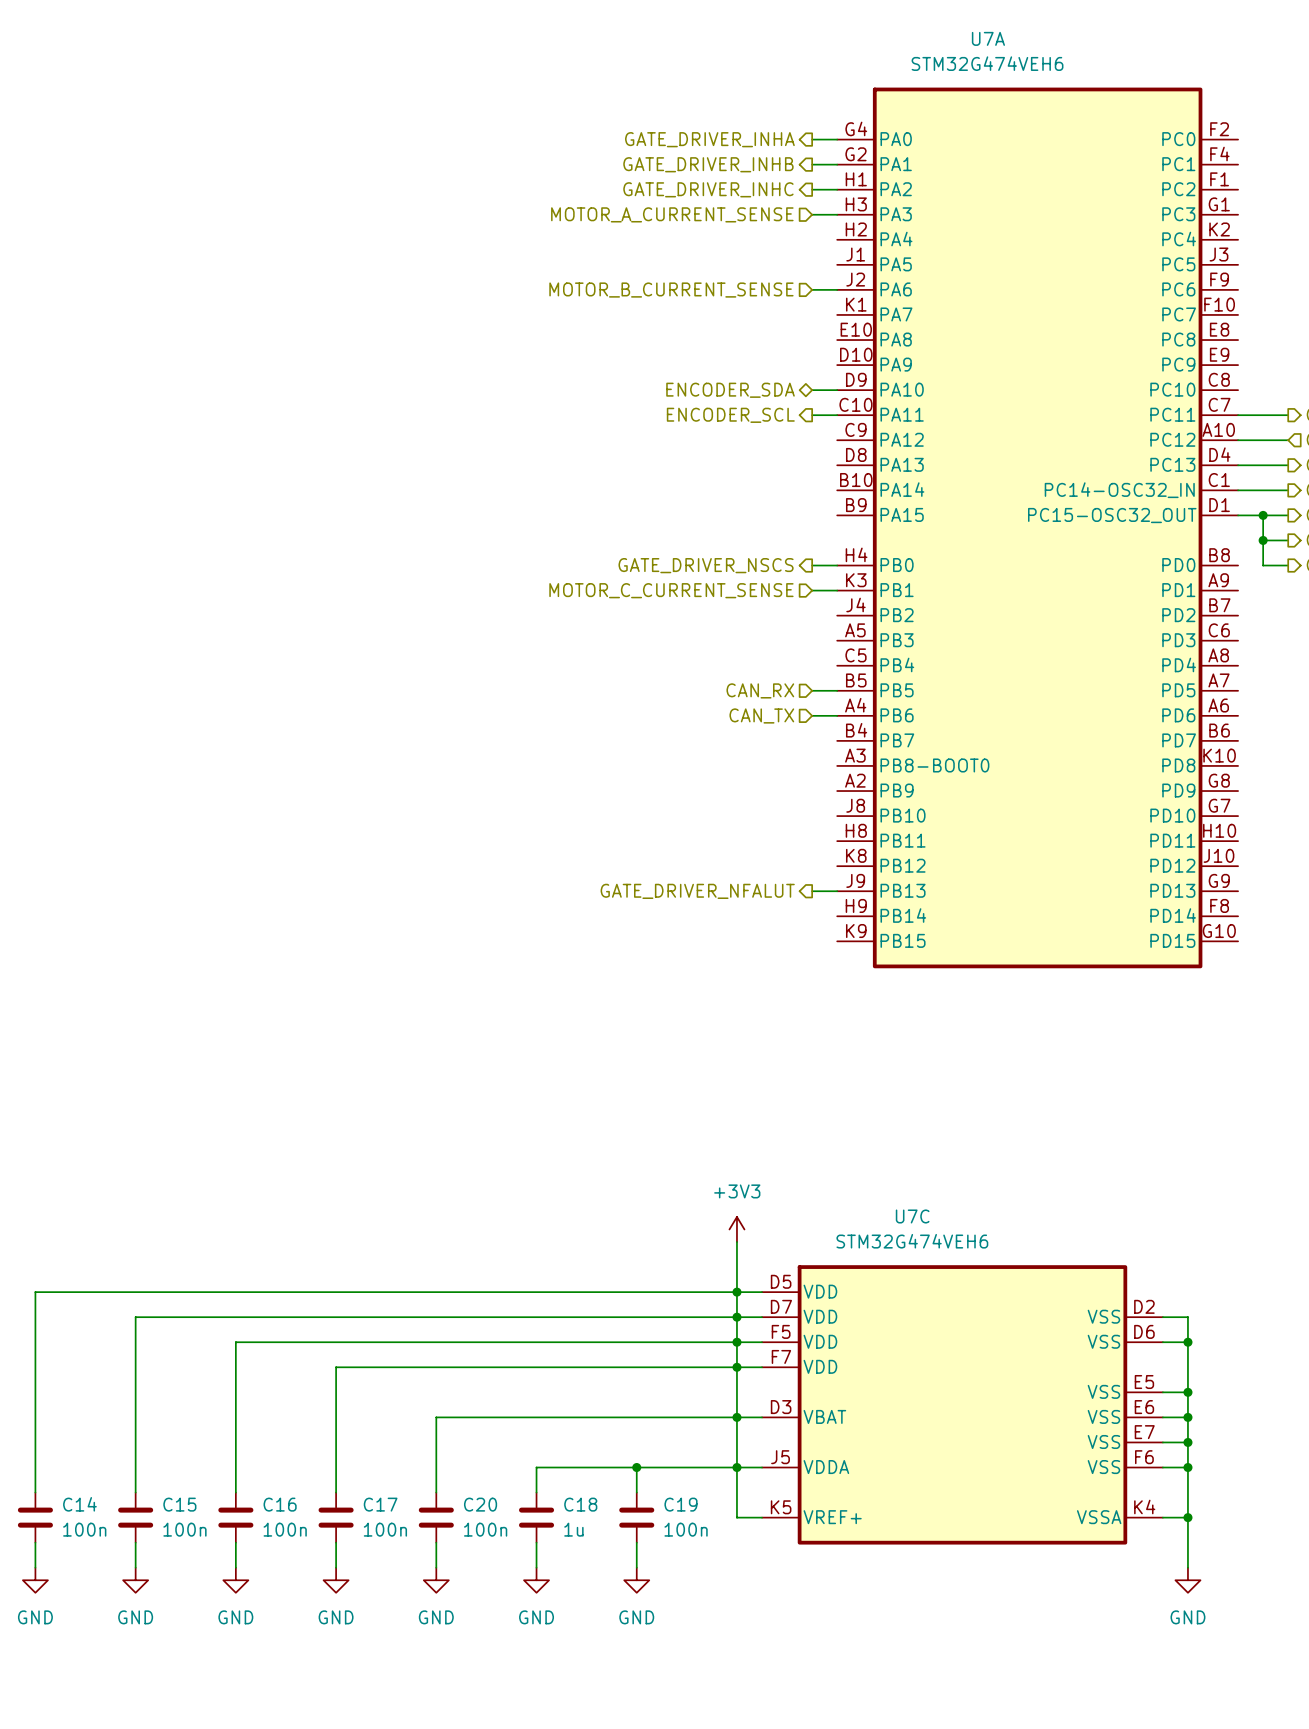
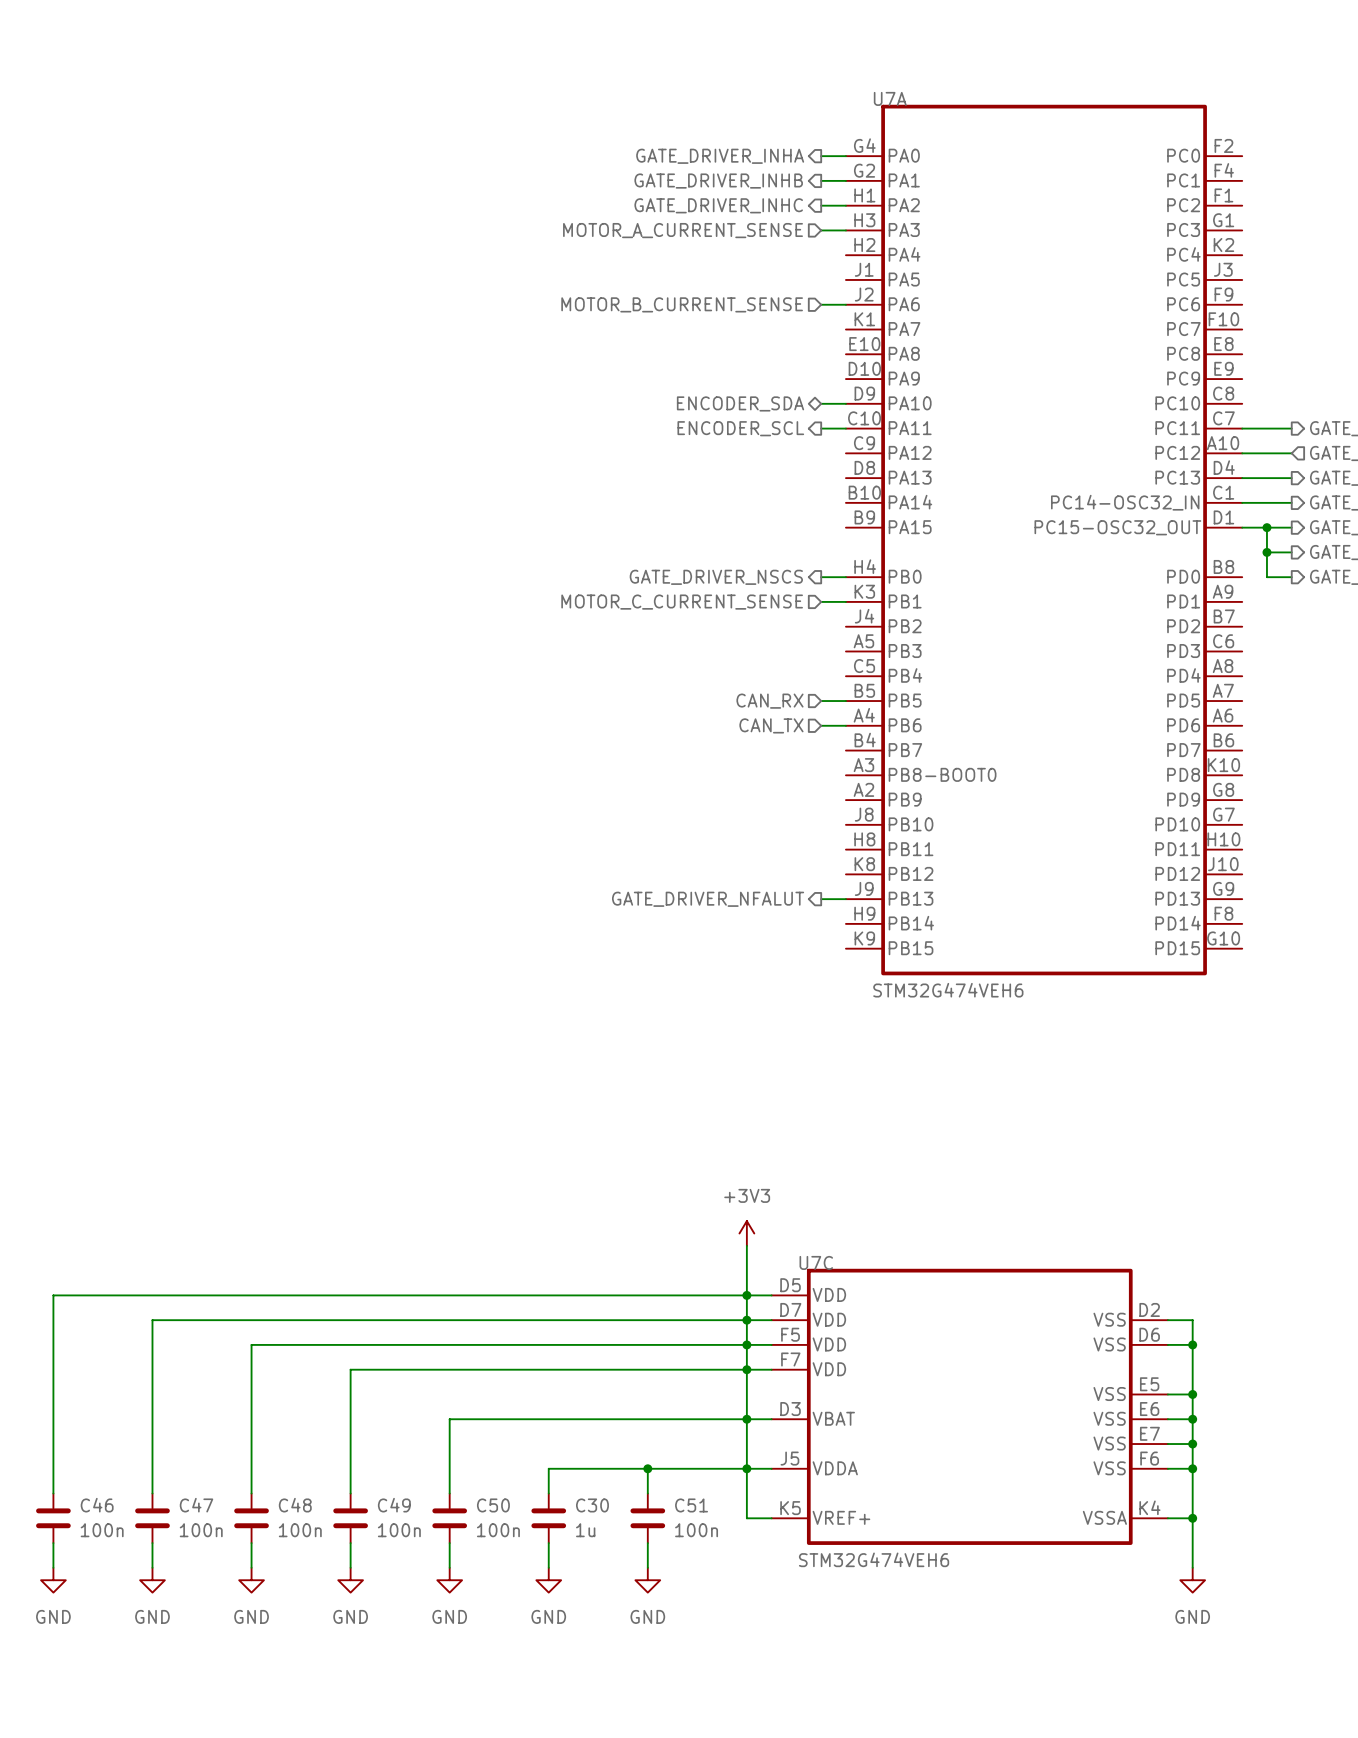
U7A name position: U7A (988, 38) -> U7A (890, 98)
U7A value position: STM32G474VEH6 (987, 63) -> STM32G474VEH6 (948, 990)
U7C name position: U7C (912, 1216) -> U7C (816, 1262)
U7C value position: STM32G474VEH6 (912, 1241) -> STM32G474VEH6 (874, 1559)
C14 name: C14 (79, 1504) -> C46 (97, 1505)
C15 name: C15 (179, 1504) -> C47 (196, 1505)
C16 name: C16 (280, 1504) -> C48 (295, 1505)
C17 name: C17 (380, 1504) -> C49 (394, 1505)
C20 name: C20 (480, 1504) -> C50 (493, 1505)
C18 name: C18 (580, 1504) -> C30 (592, 1505)
C19 name: C19 (680, 1504) -> C51 (691, 1505)

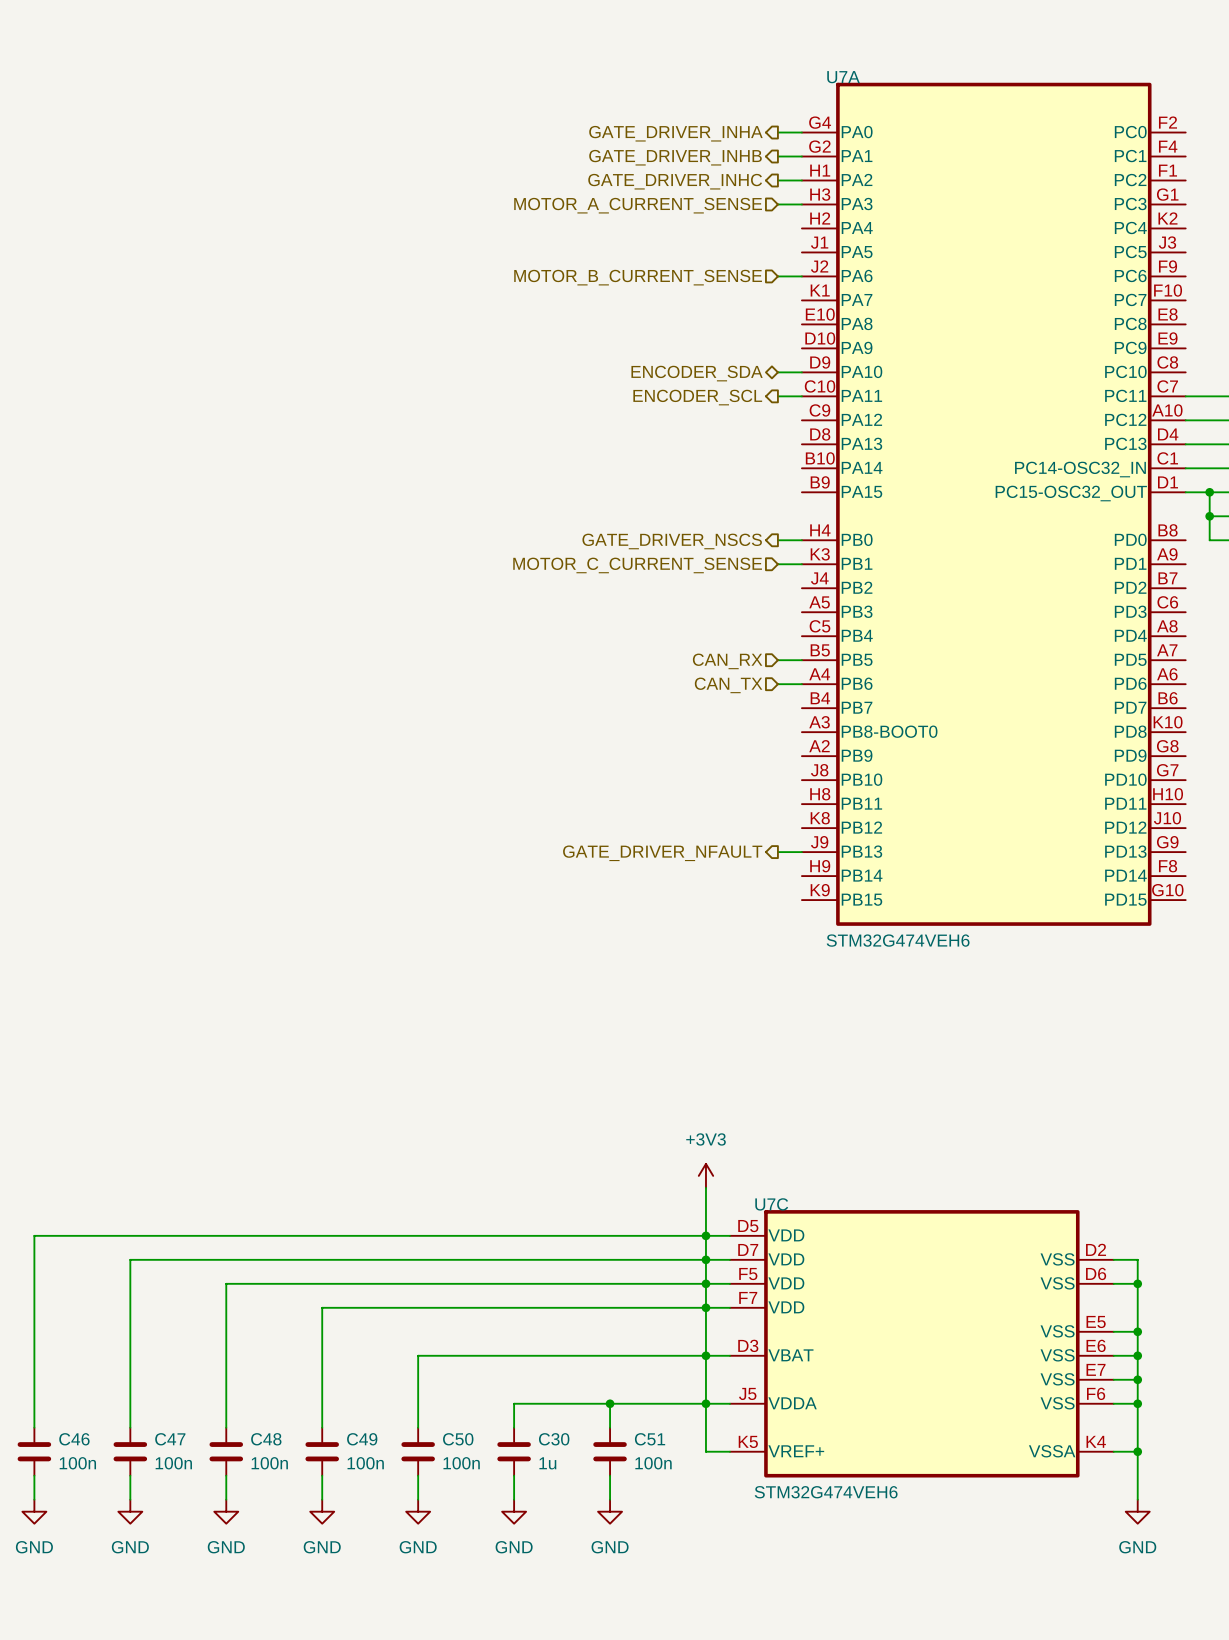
hierarchical label: GATE_DRIVER_NFALUT (708, 899) -> GATE_DRIVER_NFAULT (662, 853)

